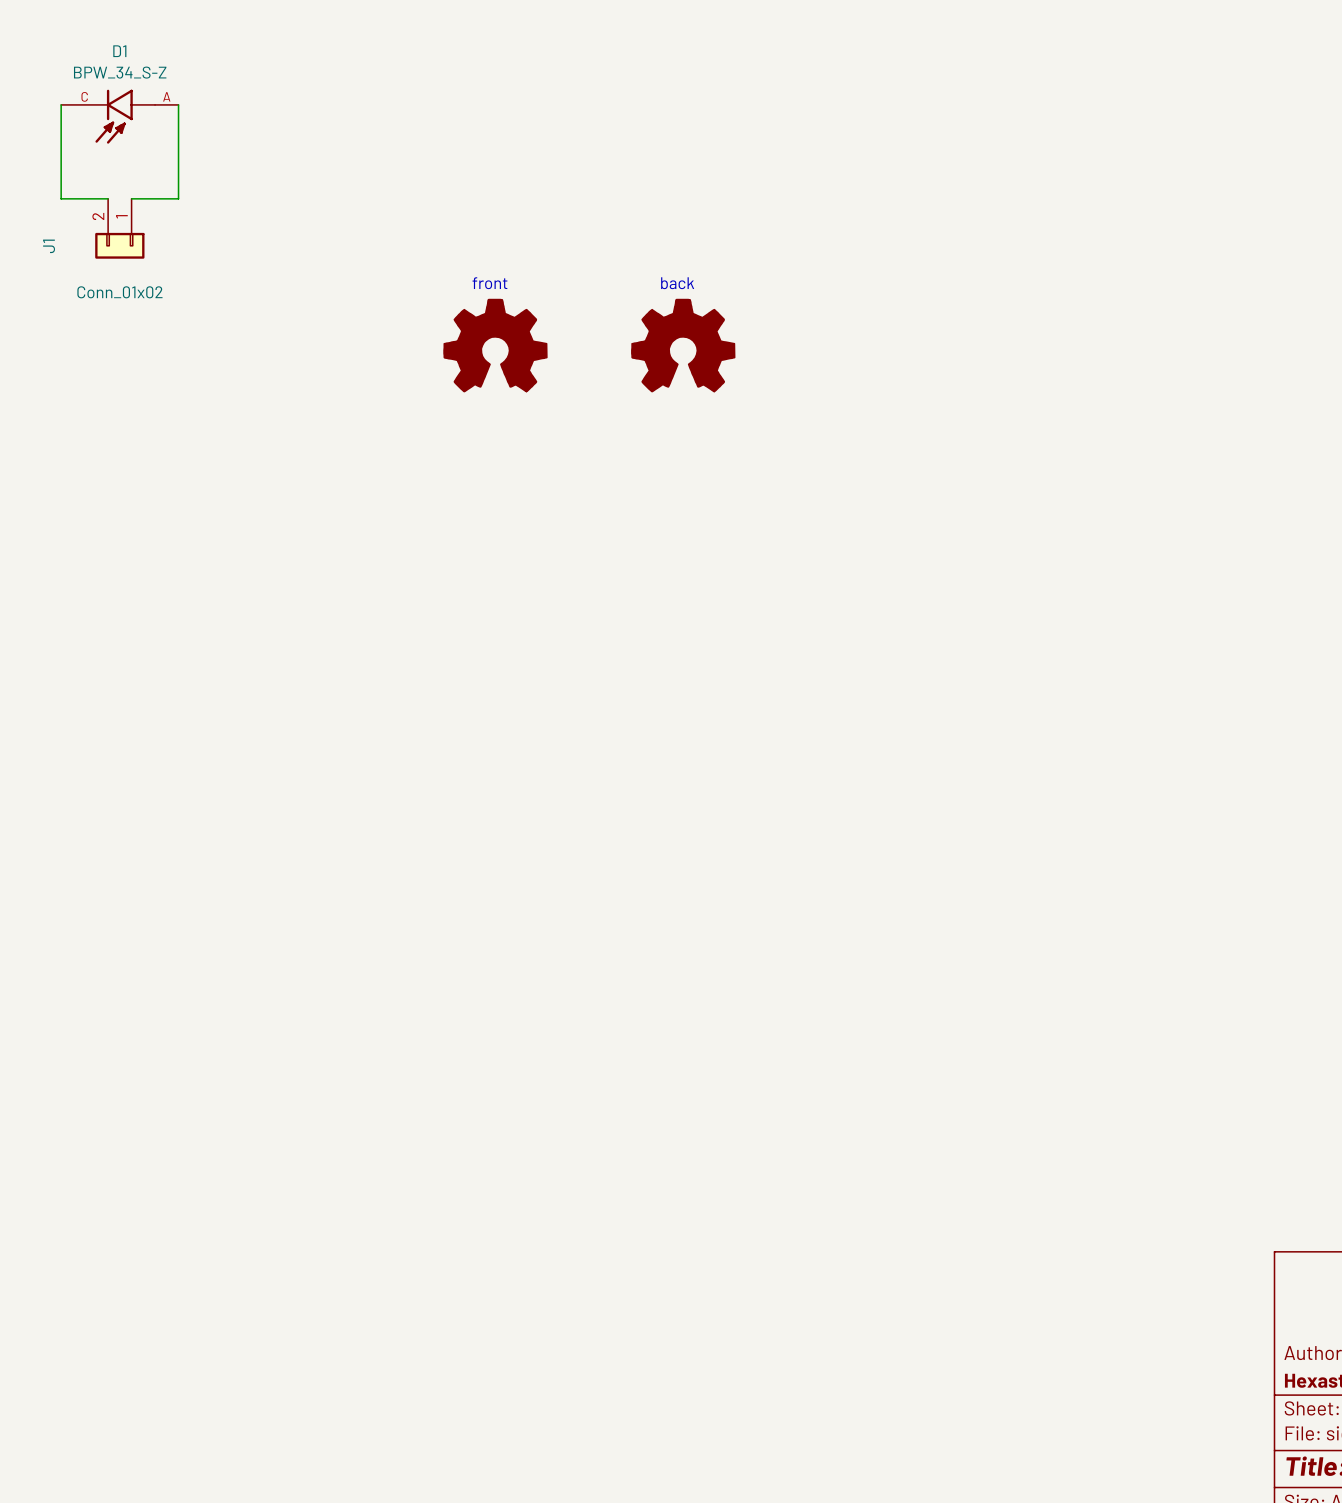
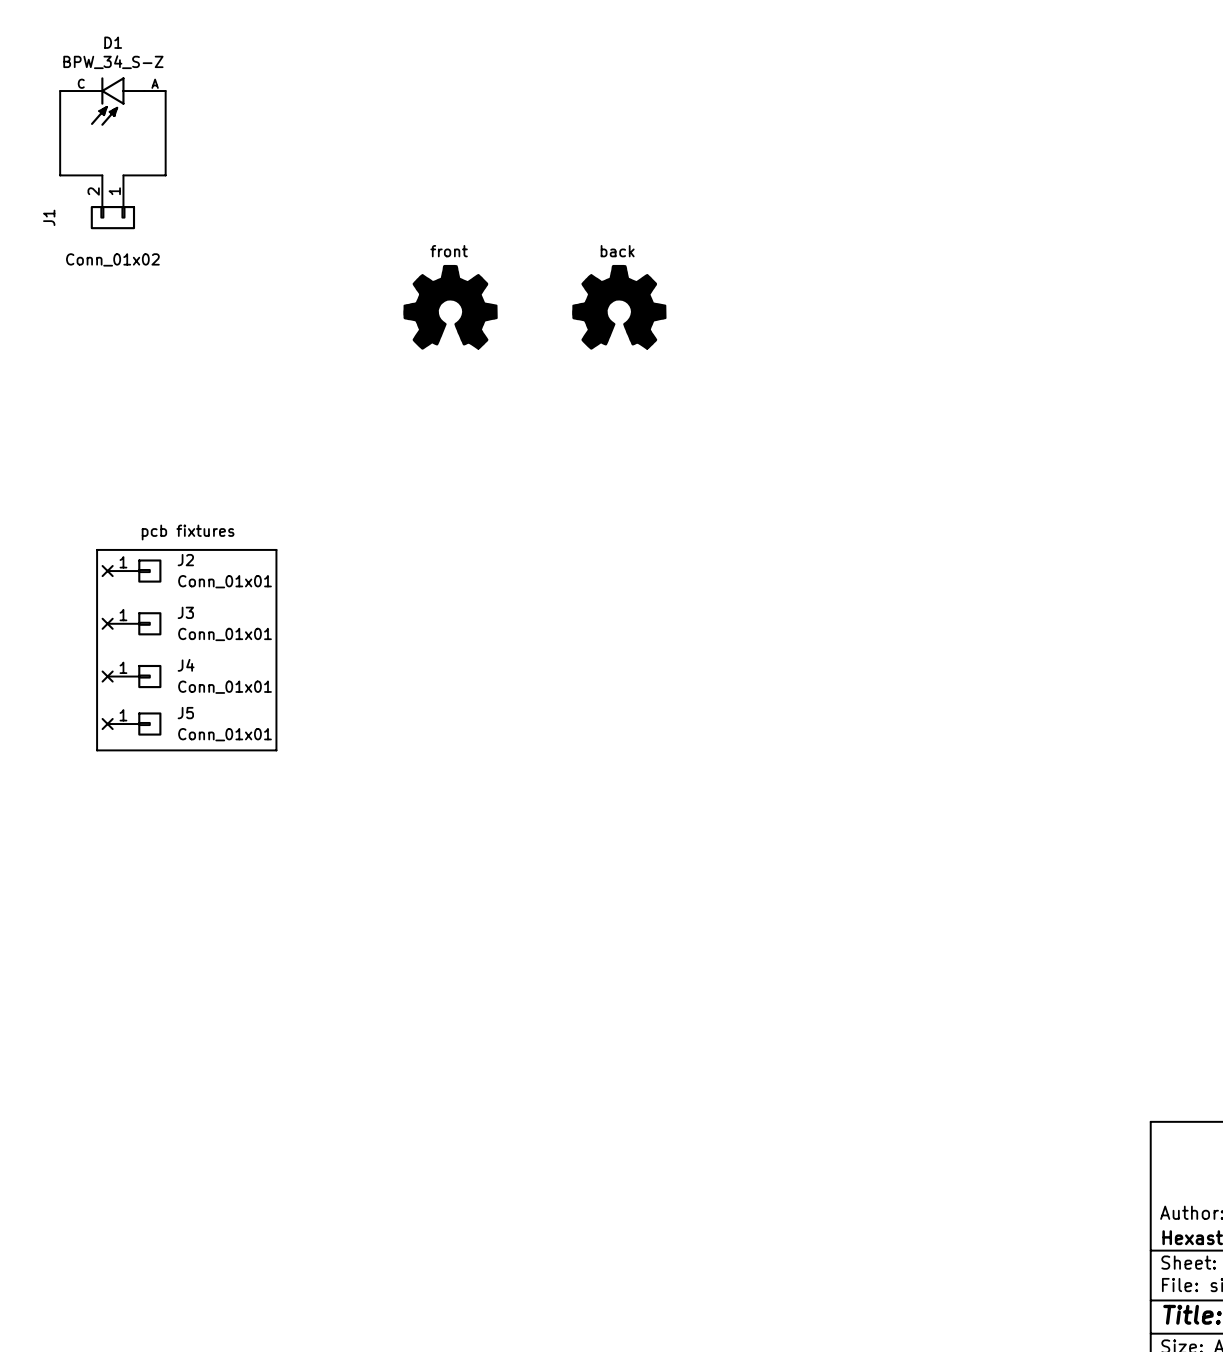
text: none -> pcb fixtures (188, 532)
line: none -> (97, 549) (276, 549) (276, 750) (97, 750) (97, 549)
no-connect mark: none -> (107, 571)
J2: none -> Conn_01x01 (134, 571)
no-connect mark: none -> (107, 623)
J3: none -> Conn_01x01 (134, 623)
no-connect mark: none -> (107, 676)
J4: none -> Conn_01x01 (134, 676)
no-connect mark: none -> (107, 724)
J5: none -> Conn_01x01 (134, 724)

